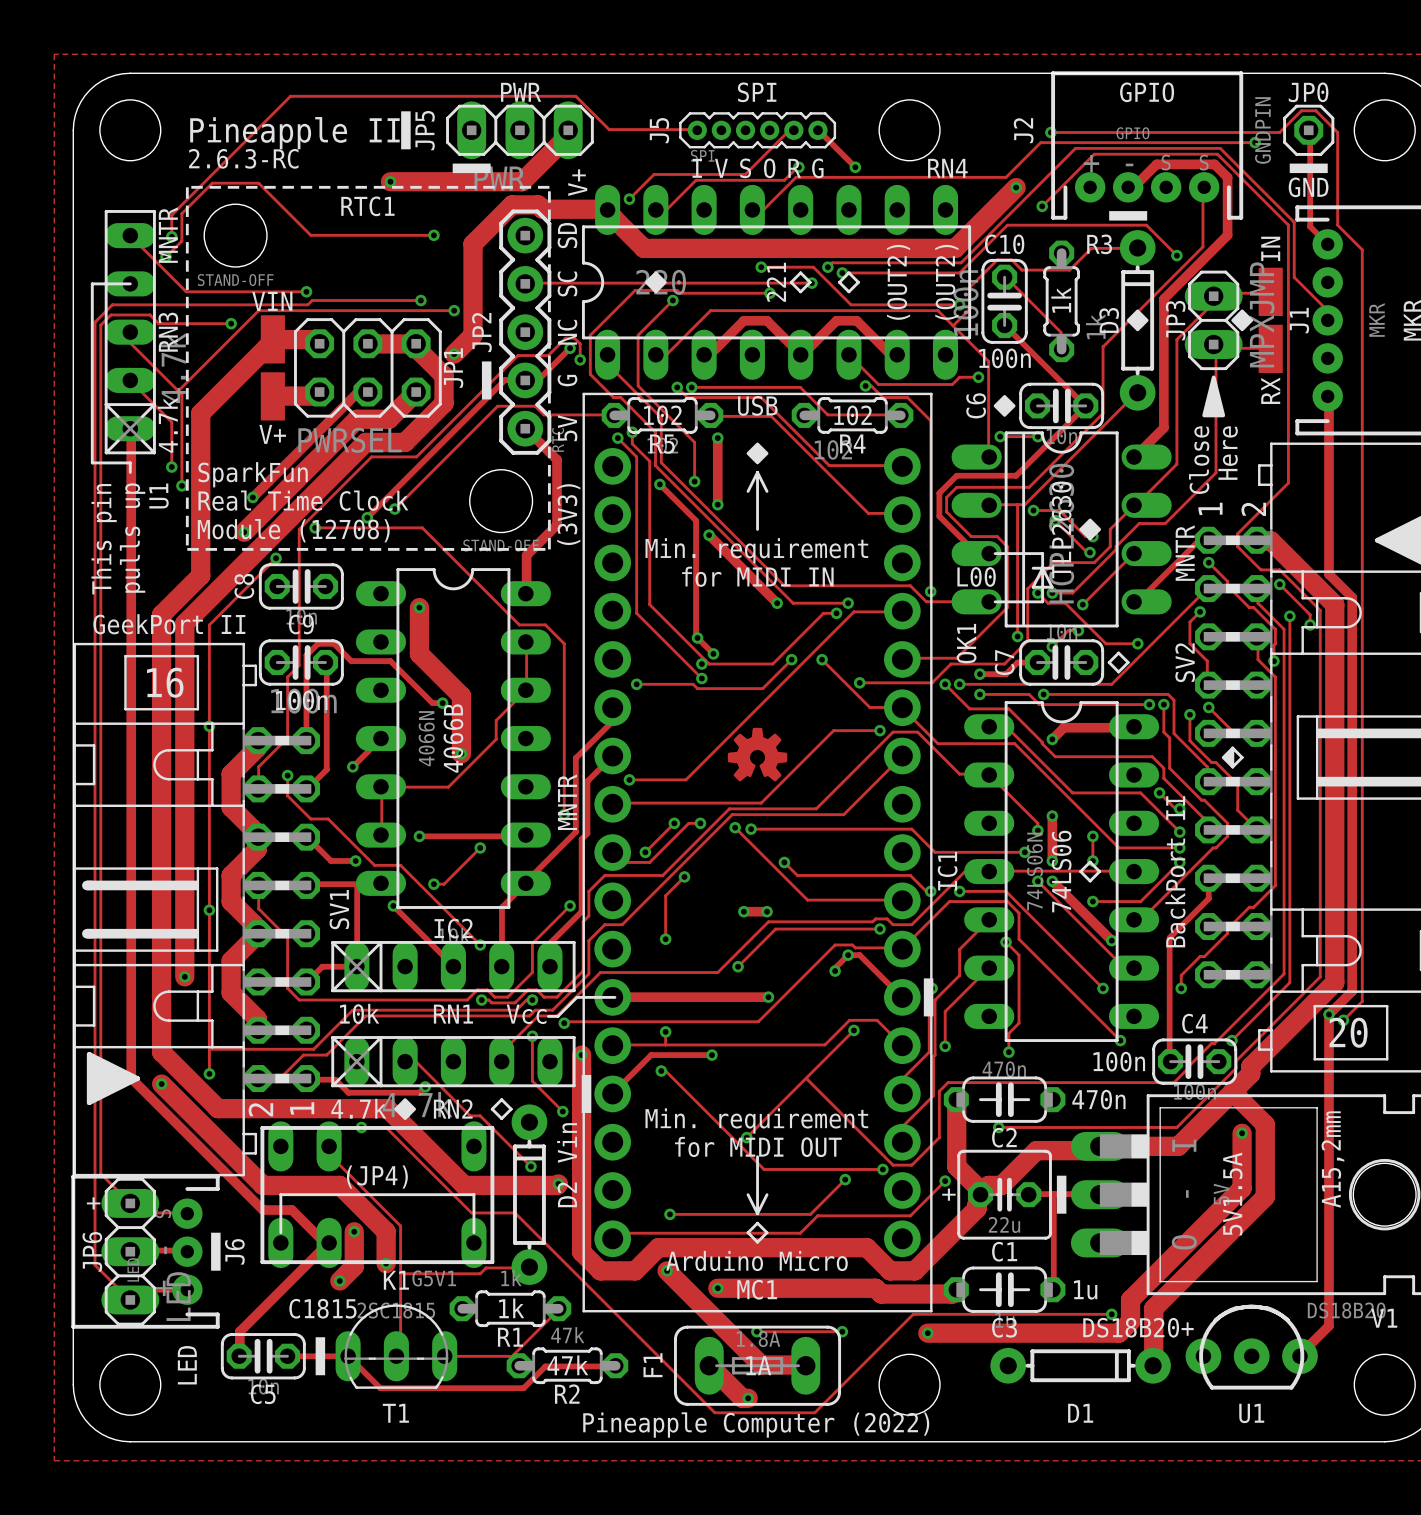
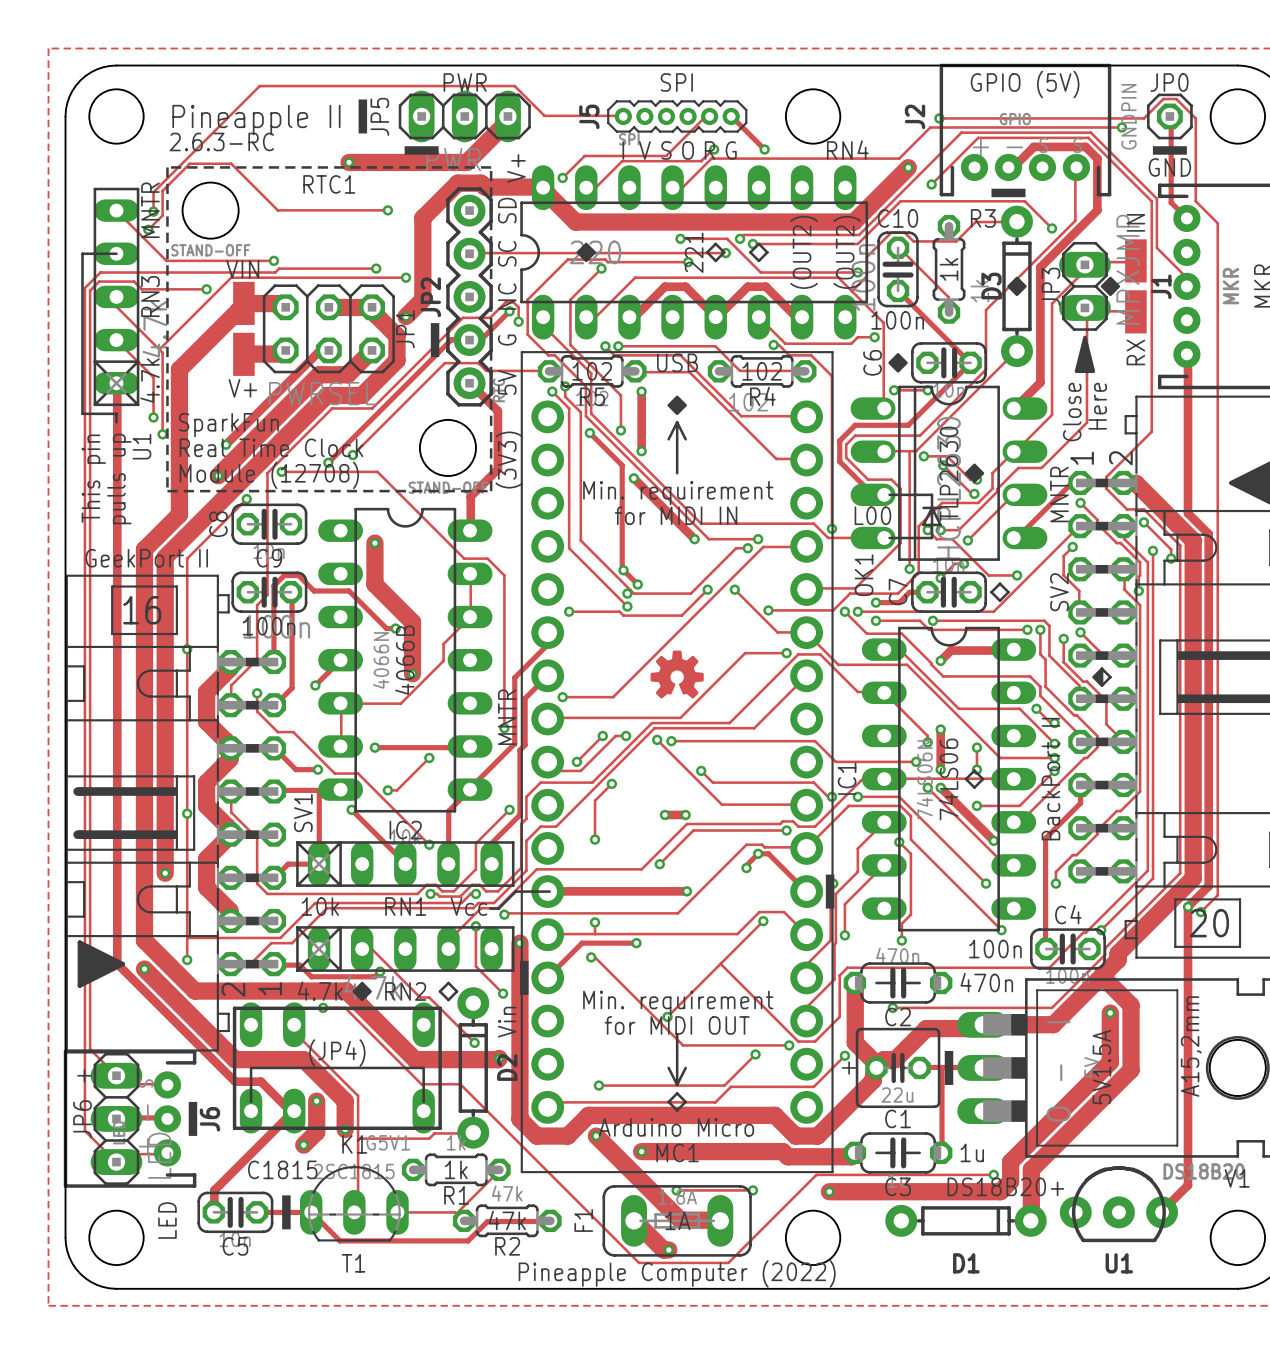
text: GPIO (1147, 92) -> GPIO (5V) (1025, 84)

